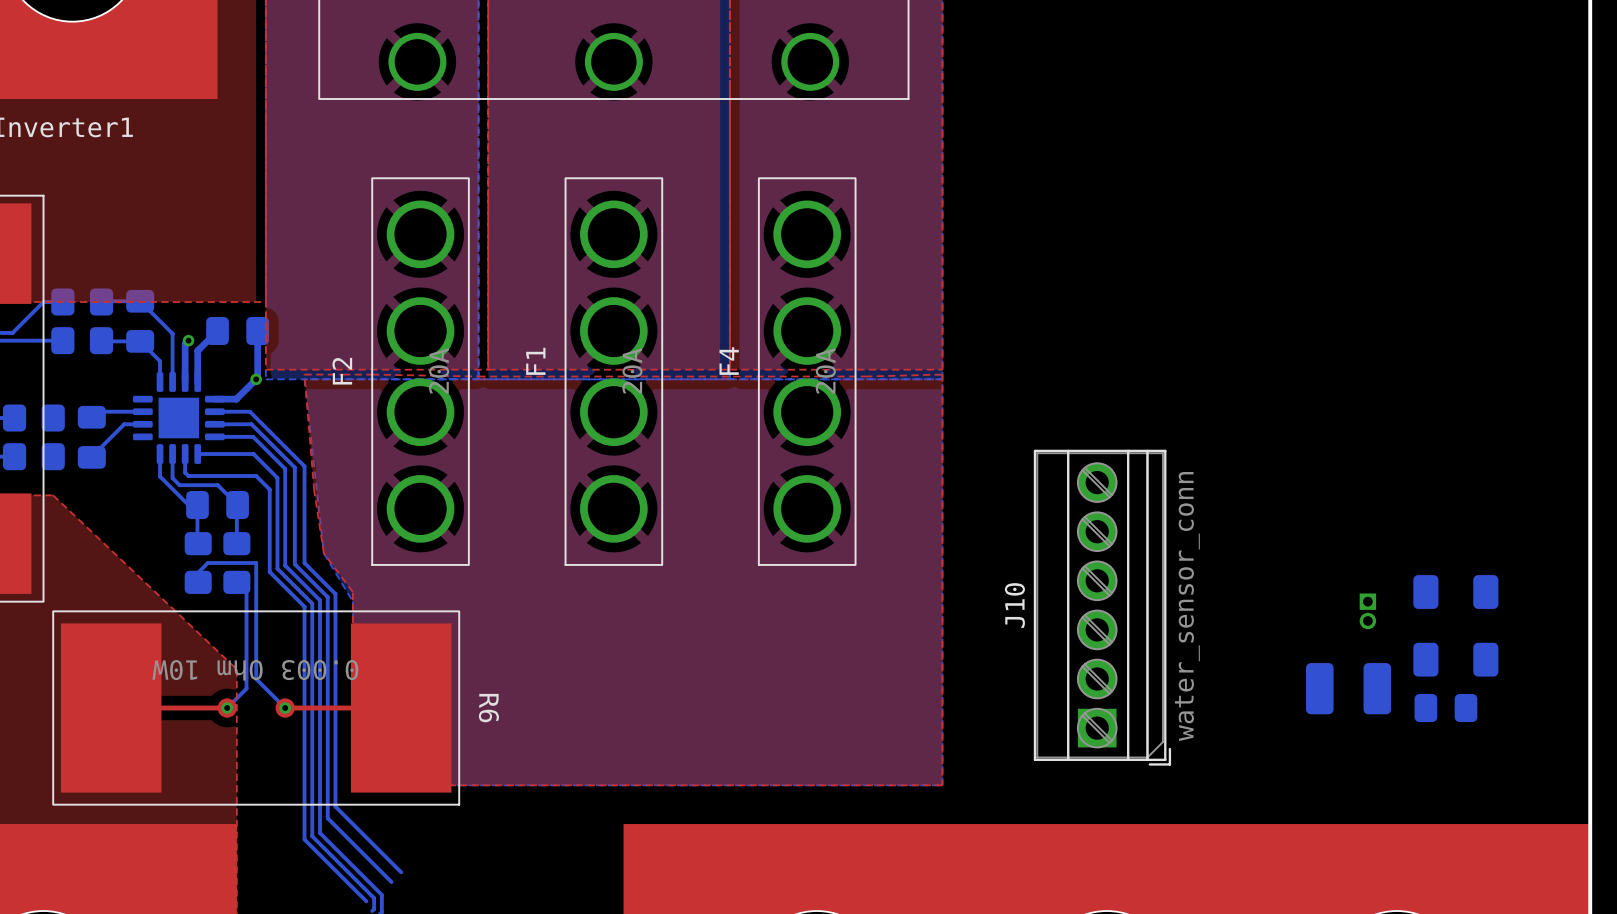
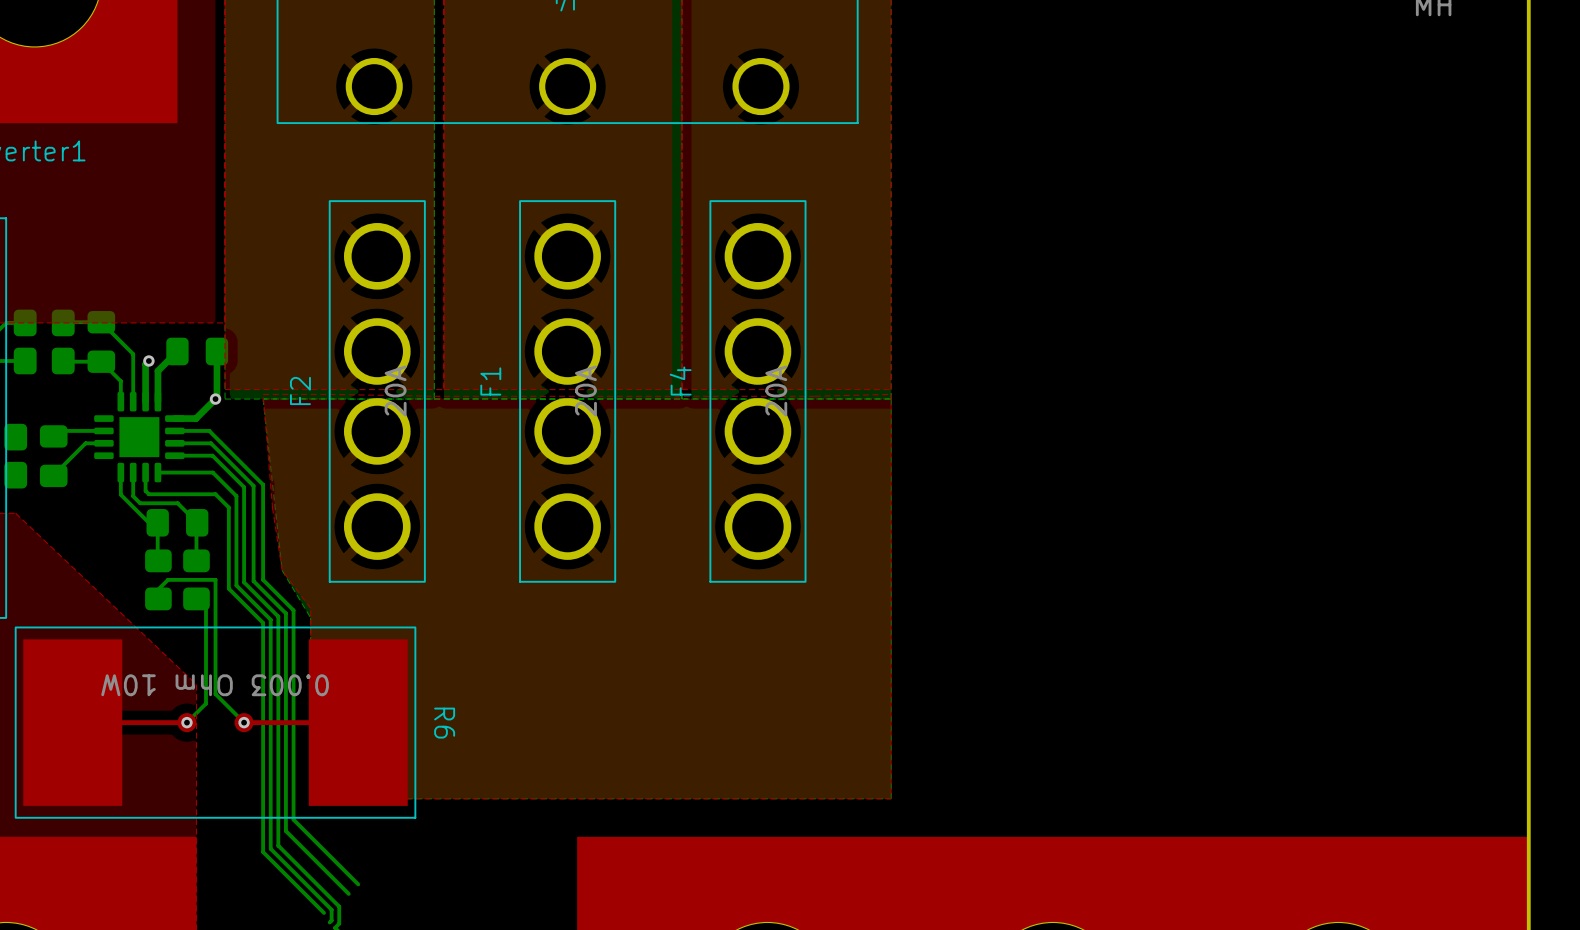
part: (1455, 592) -> none
J10: water_sensor_conn (1102, 607) -> none
part: (1367, 611) -> none
part: (1455, 659) -> none
part: (1348, 688) -> none
part: (1445, 708) -> none

